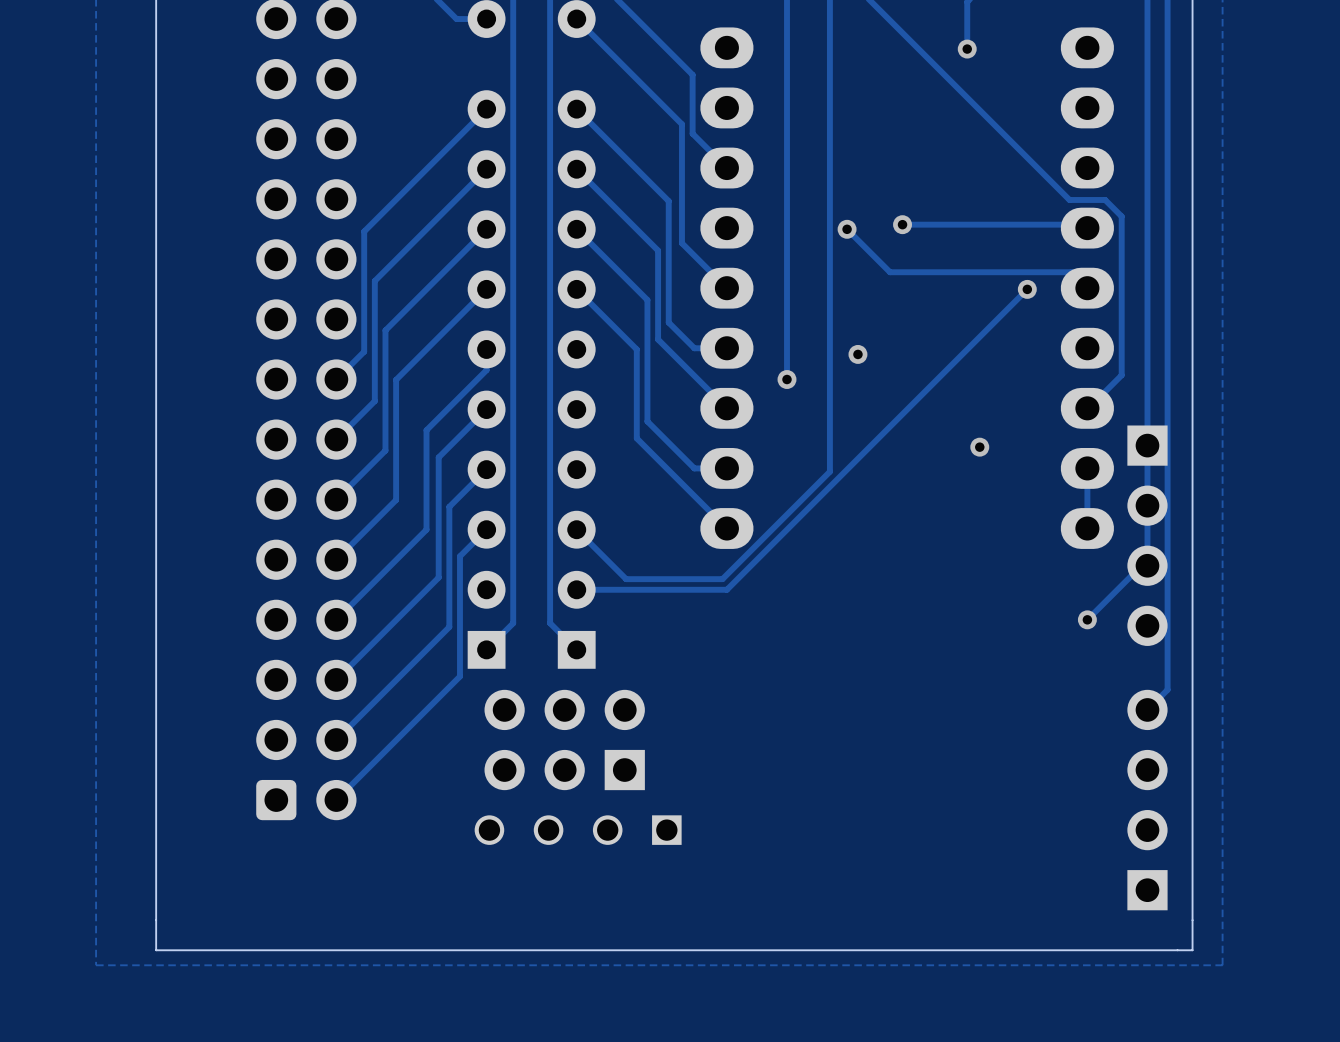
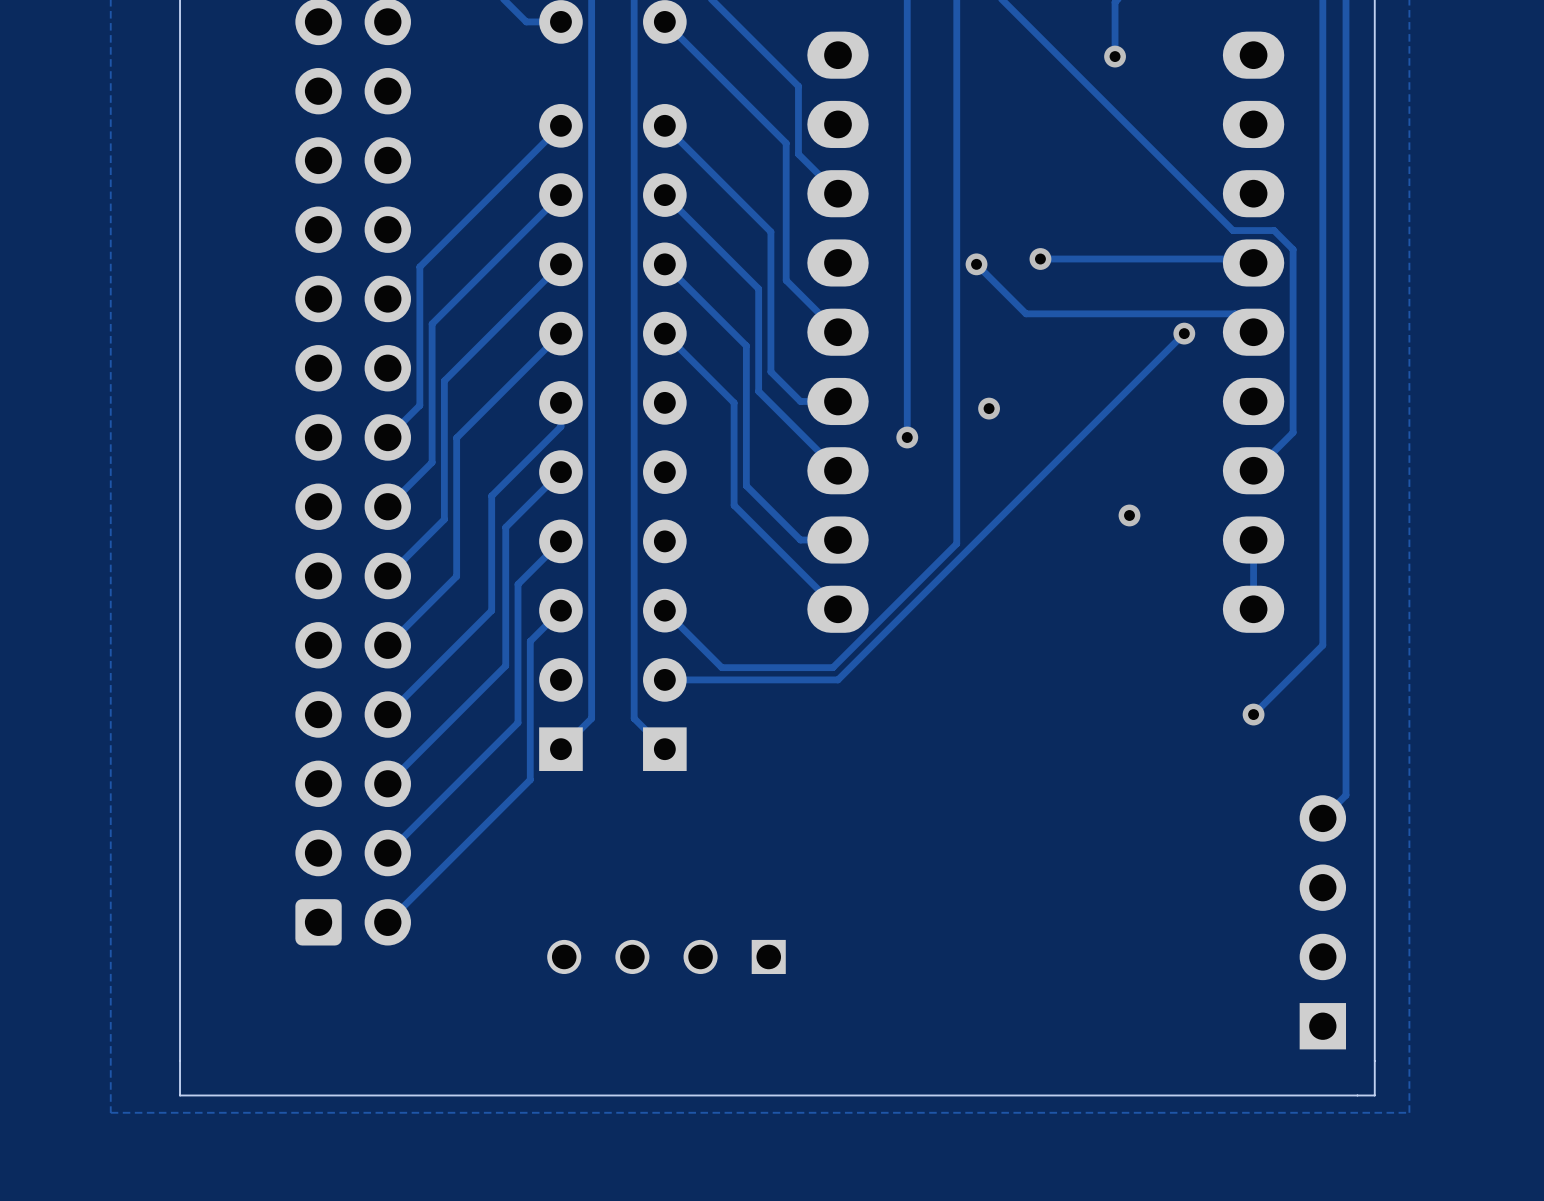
part: (1147, 535) -> none
part: (564, 739) -> none

